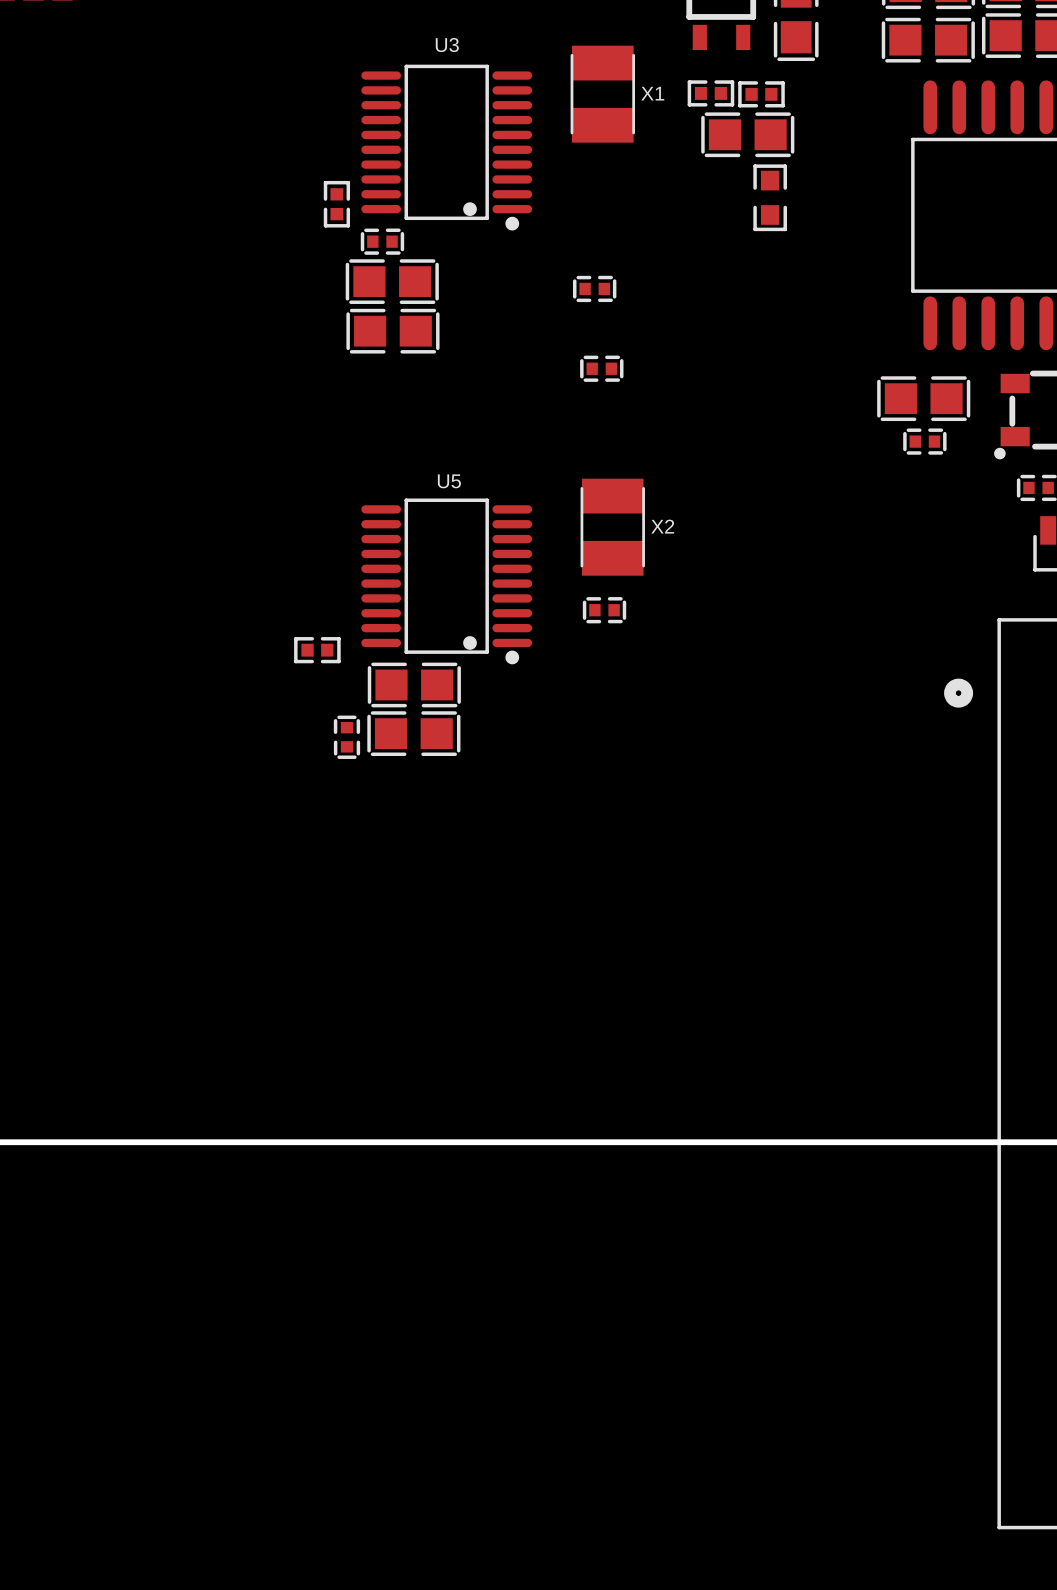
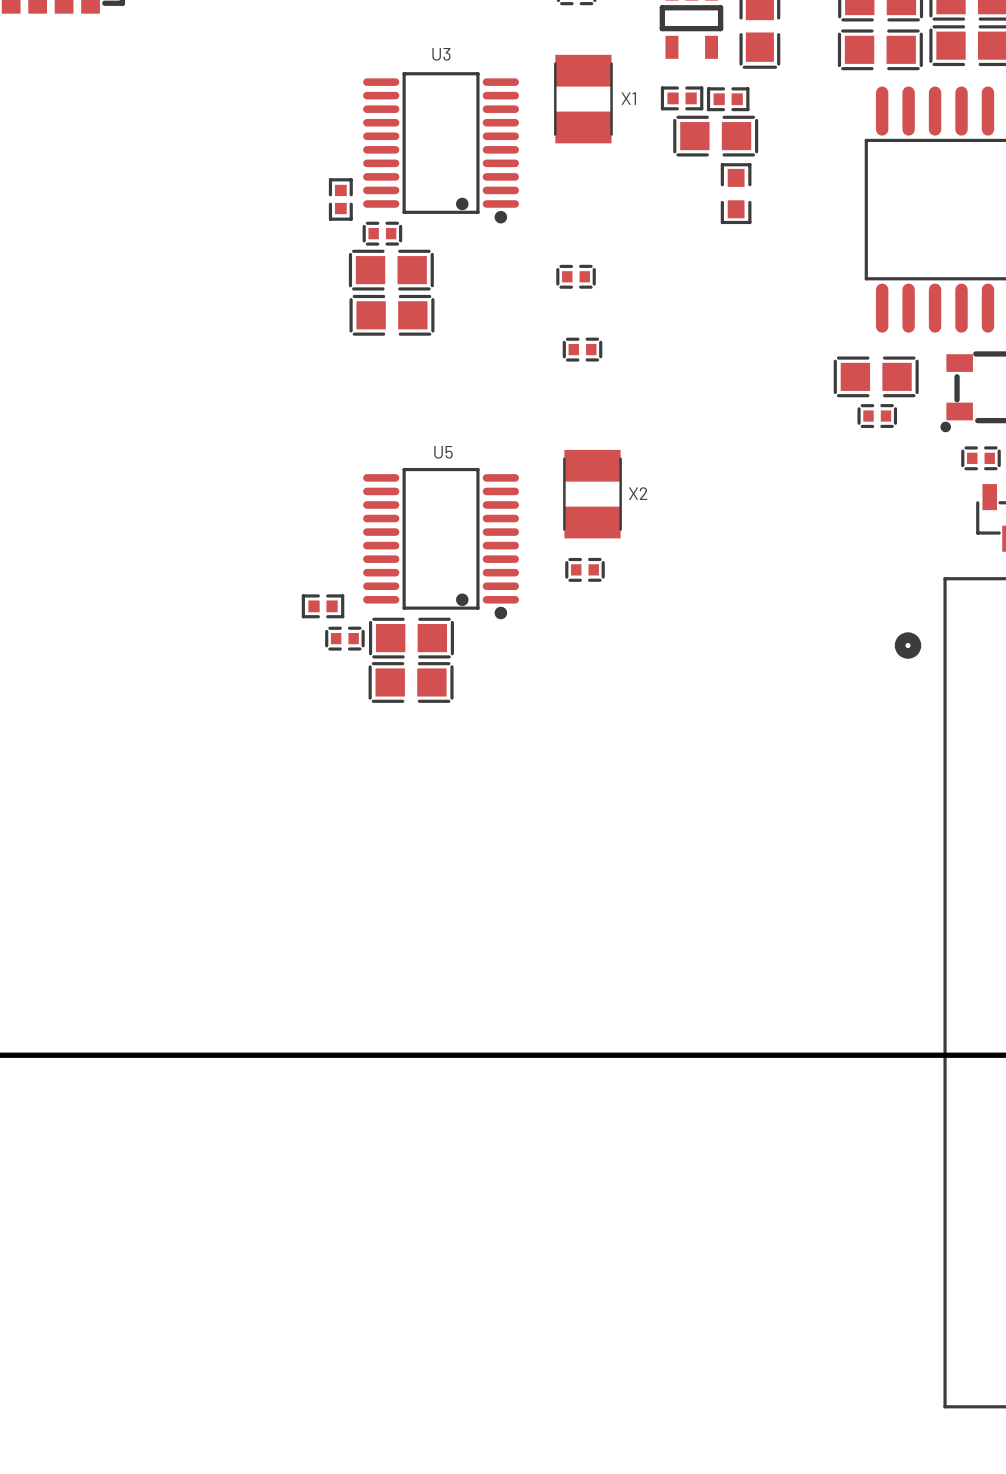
part rotation: 0° (346, 737) -> 90° clockwise (344, 638)
part position: (346, 737) -> (344, 638)

